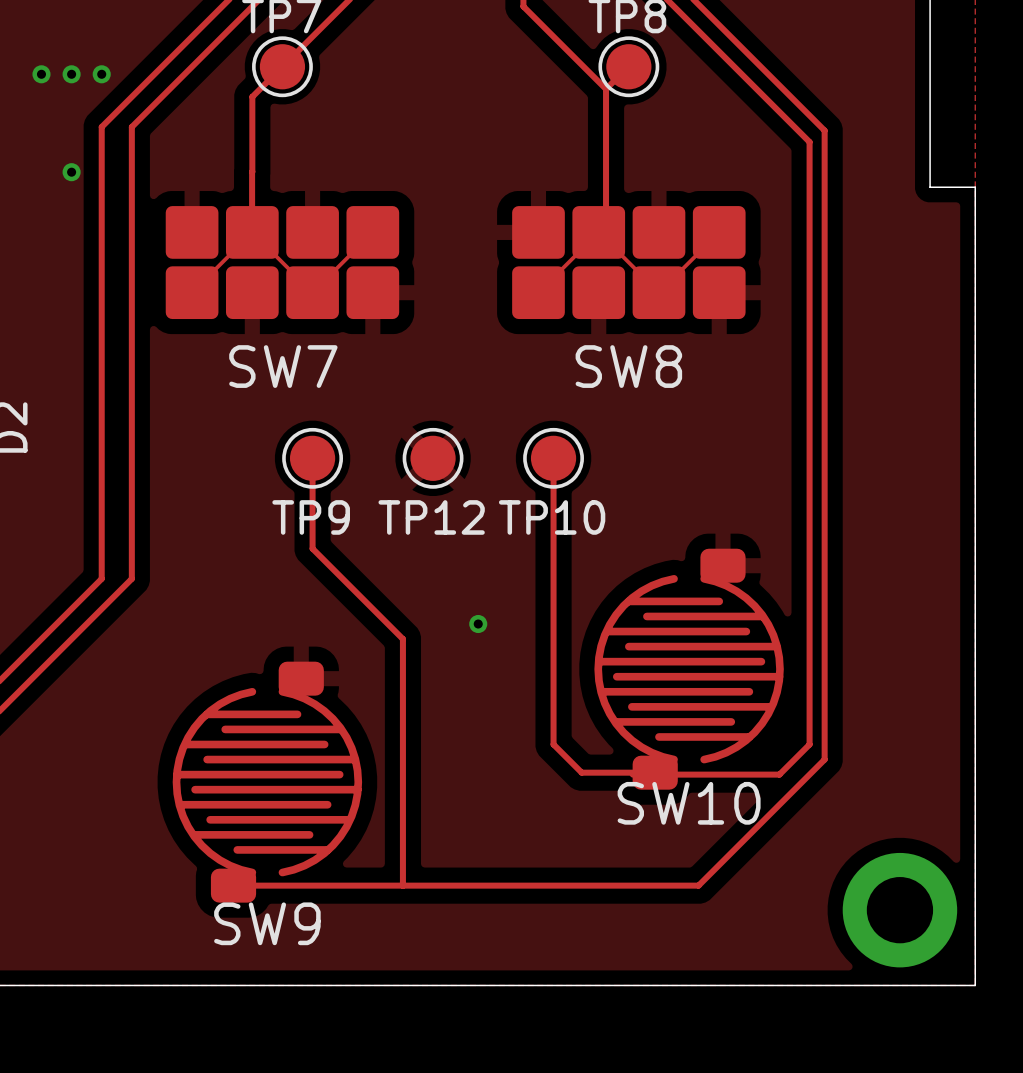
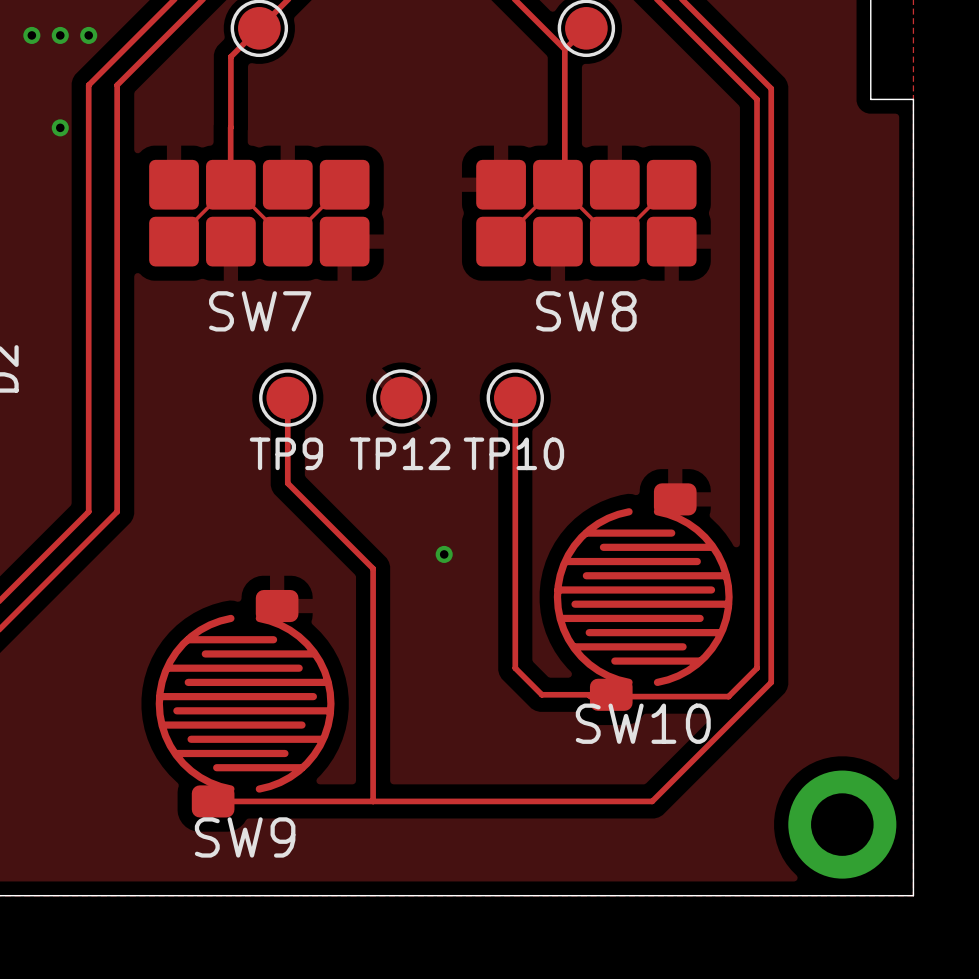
board edge: (930, 142) (930, 187) (975, 187) -> (870, 99) (913, 99) (913, 142)

